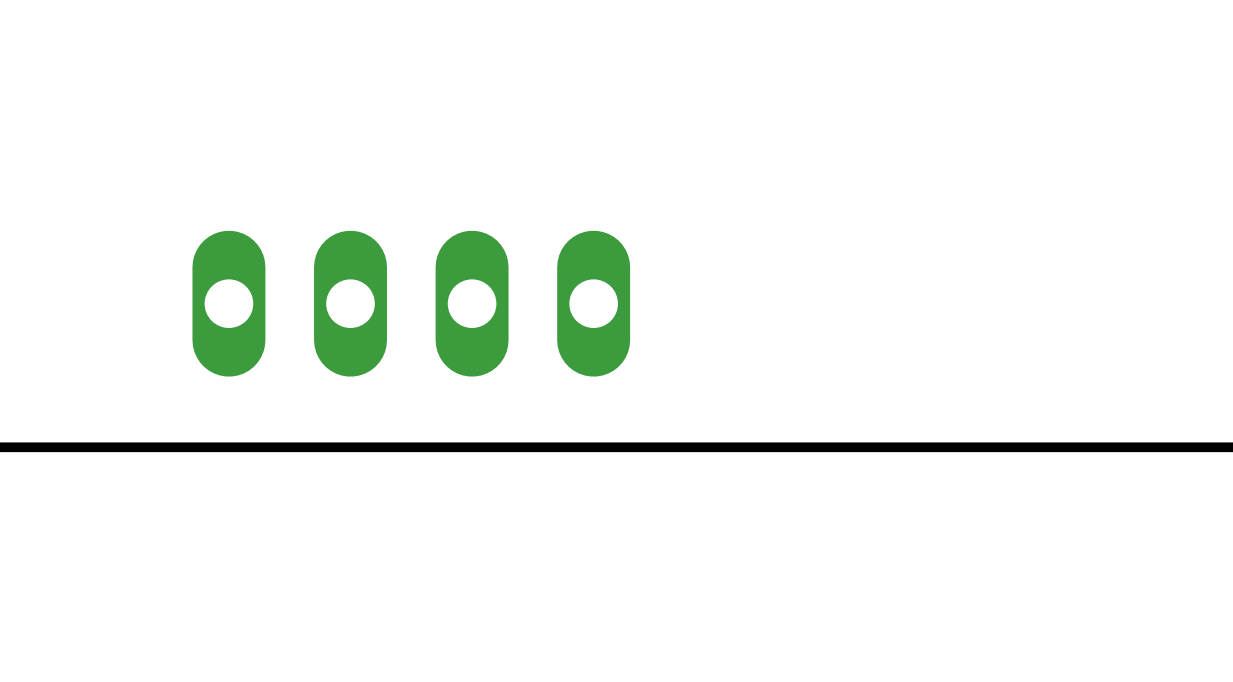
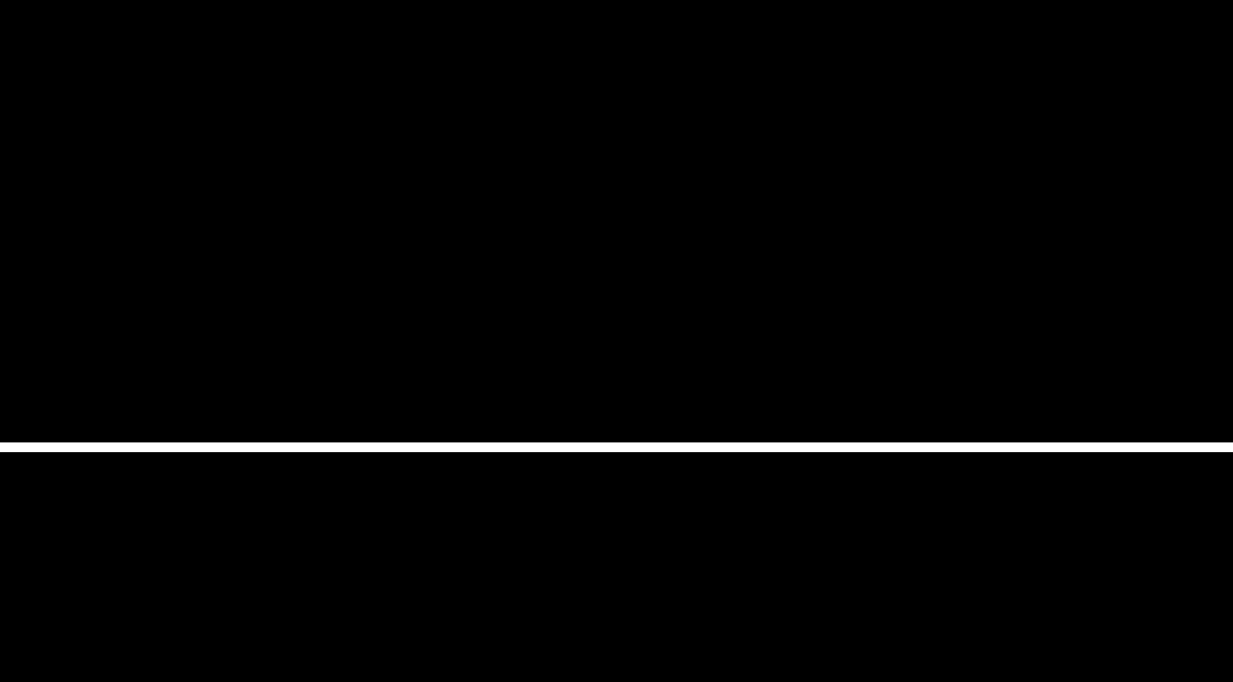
part: (411, 303) -> none

